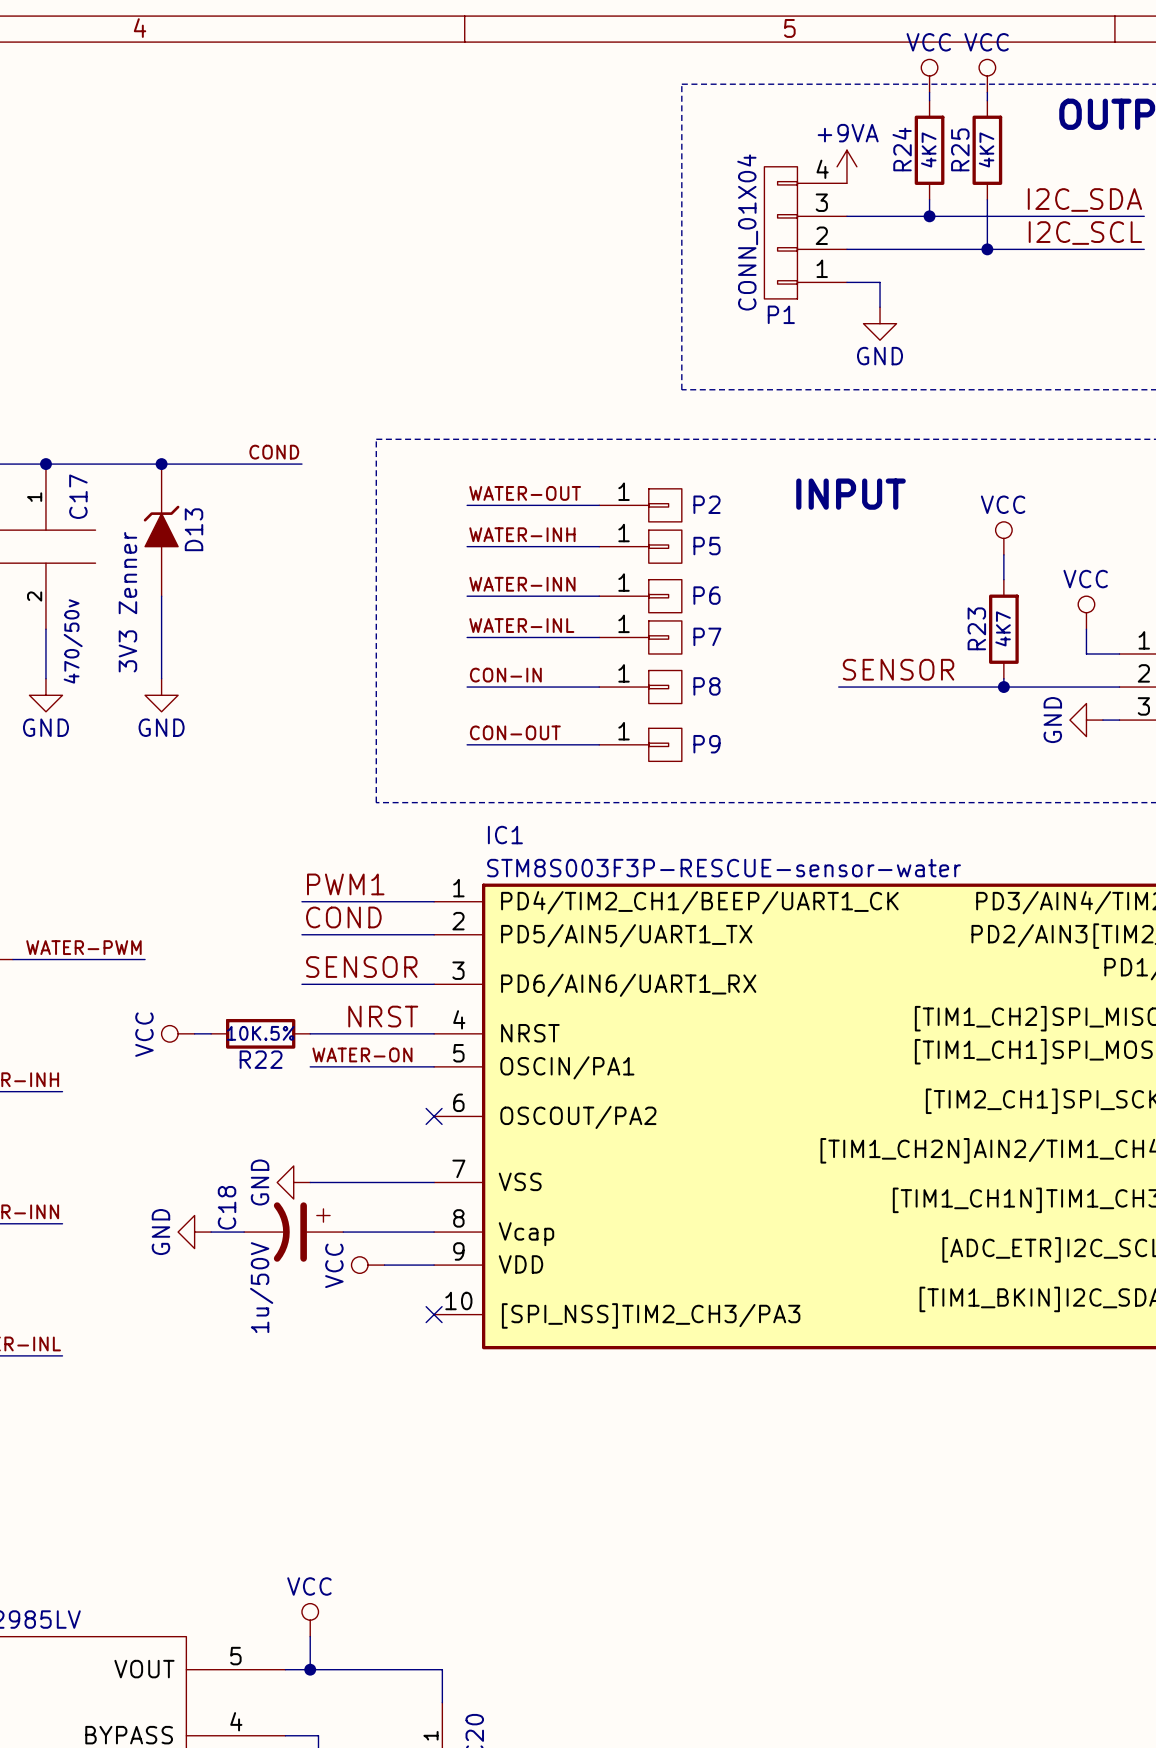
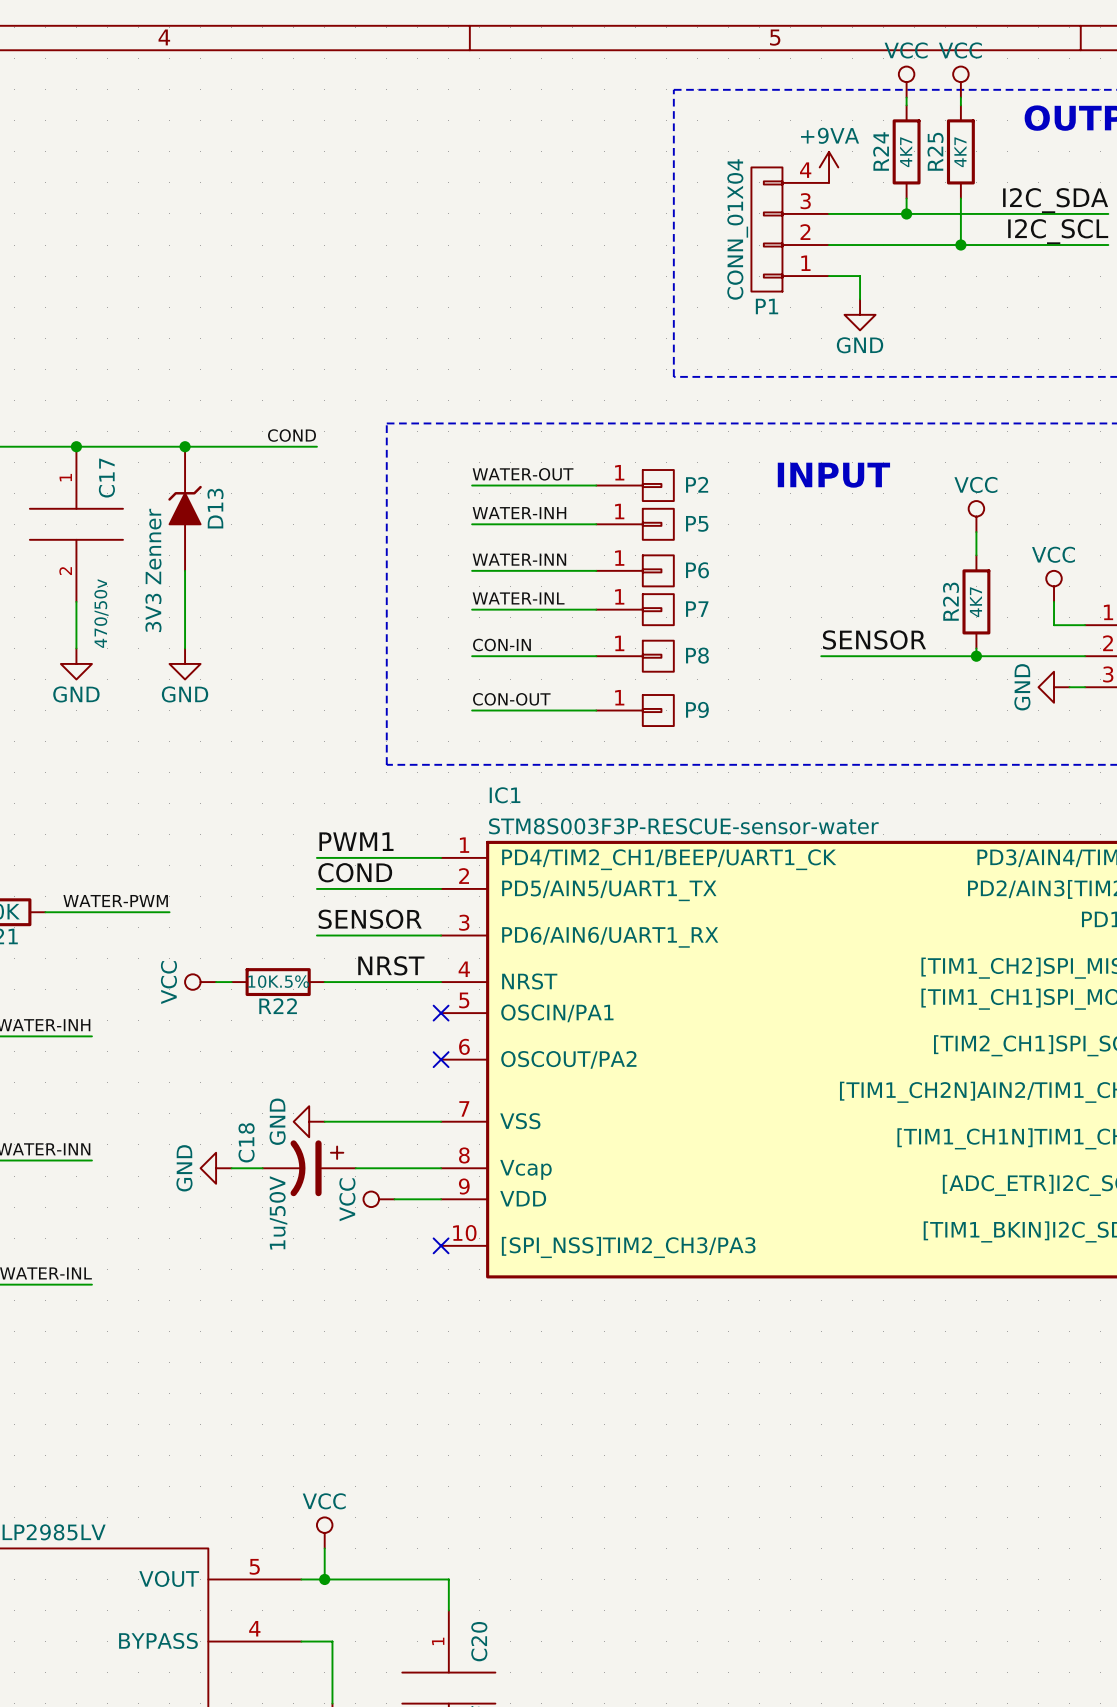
label: WATER-ON (362, 1054) -> none
wire: (310, 1066) (434, 1066) -> none
no-connect mark: none -> (441, 1013)

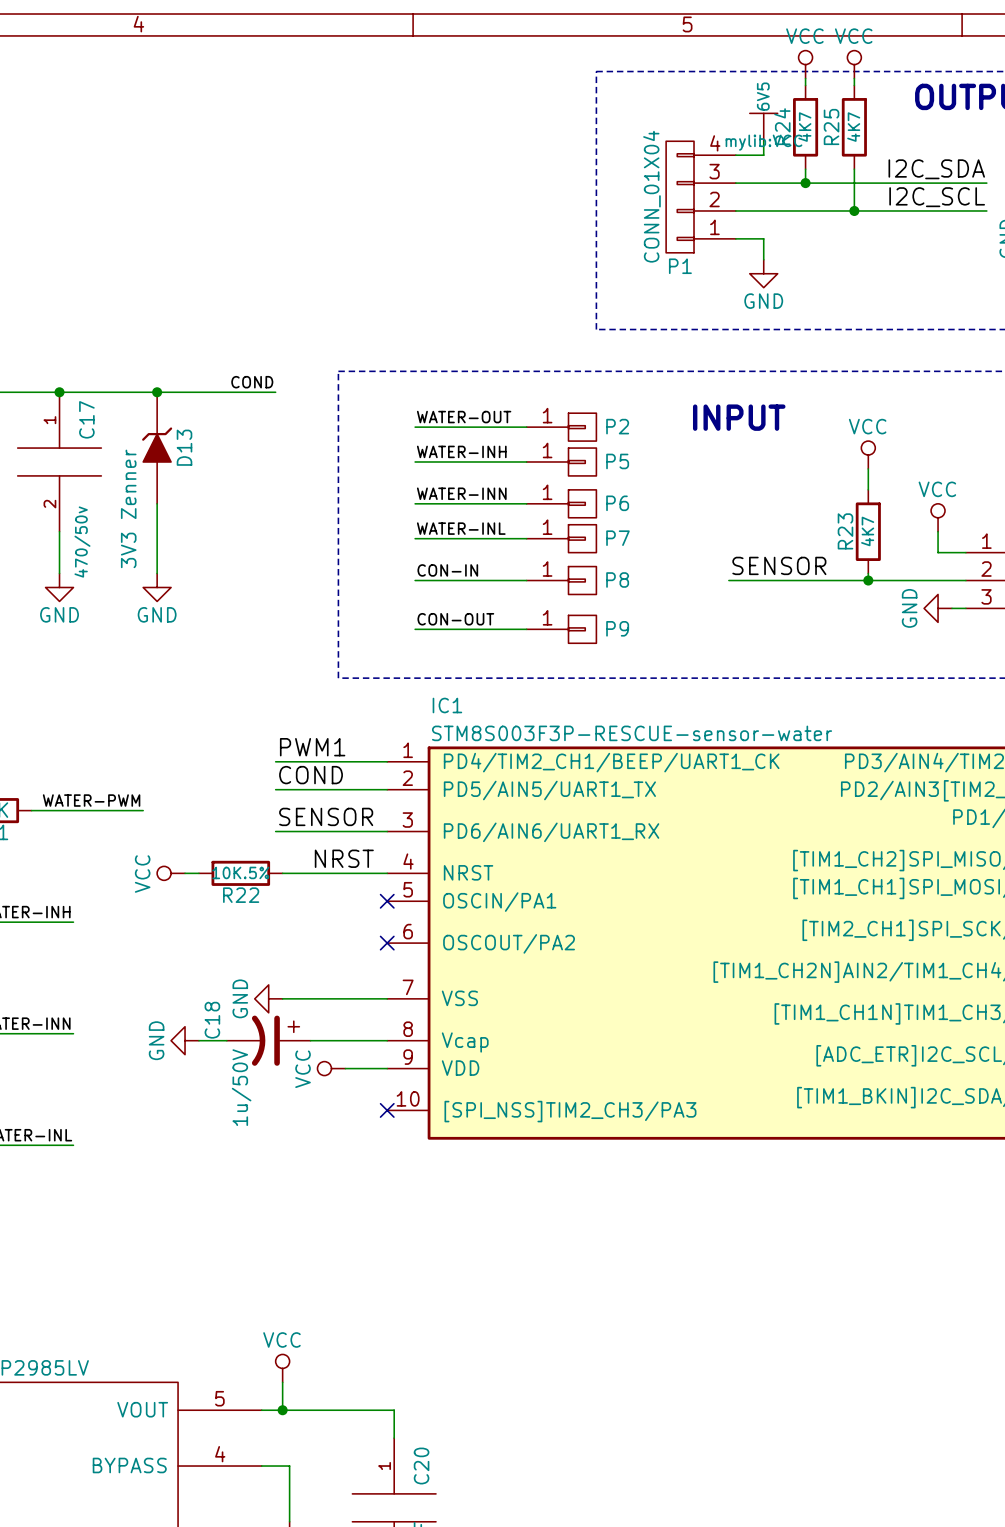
power symbol: none -> (763, 127)
power symbol: +9VA (829, 167) -> none
wire: none -> (763, 141) (763, 155) (735, 155)

